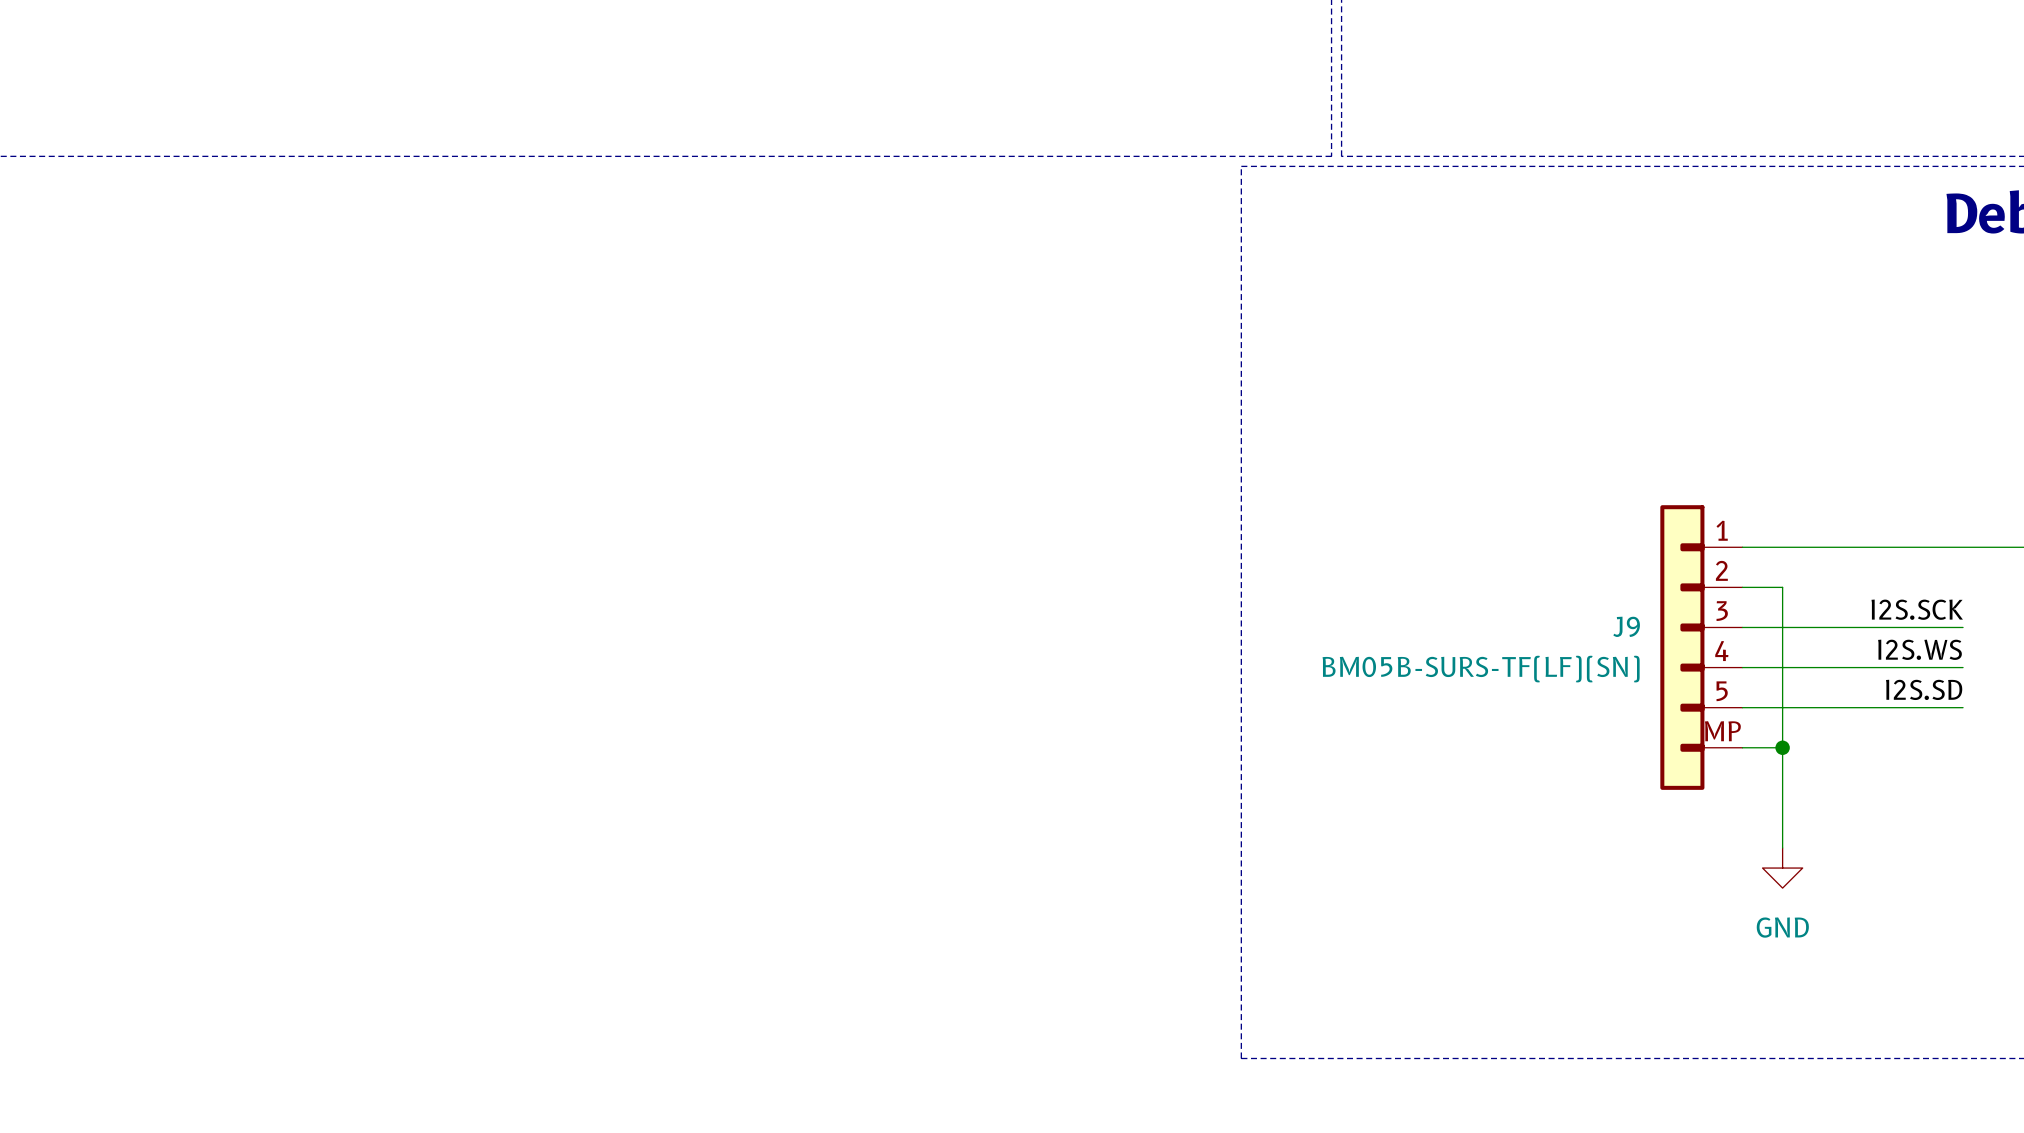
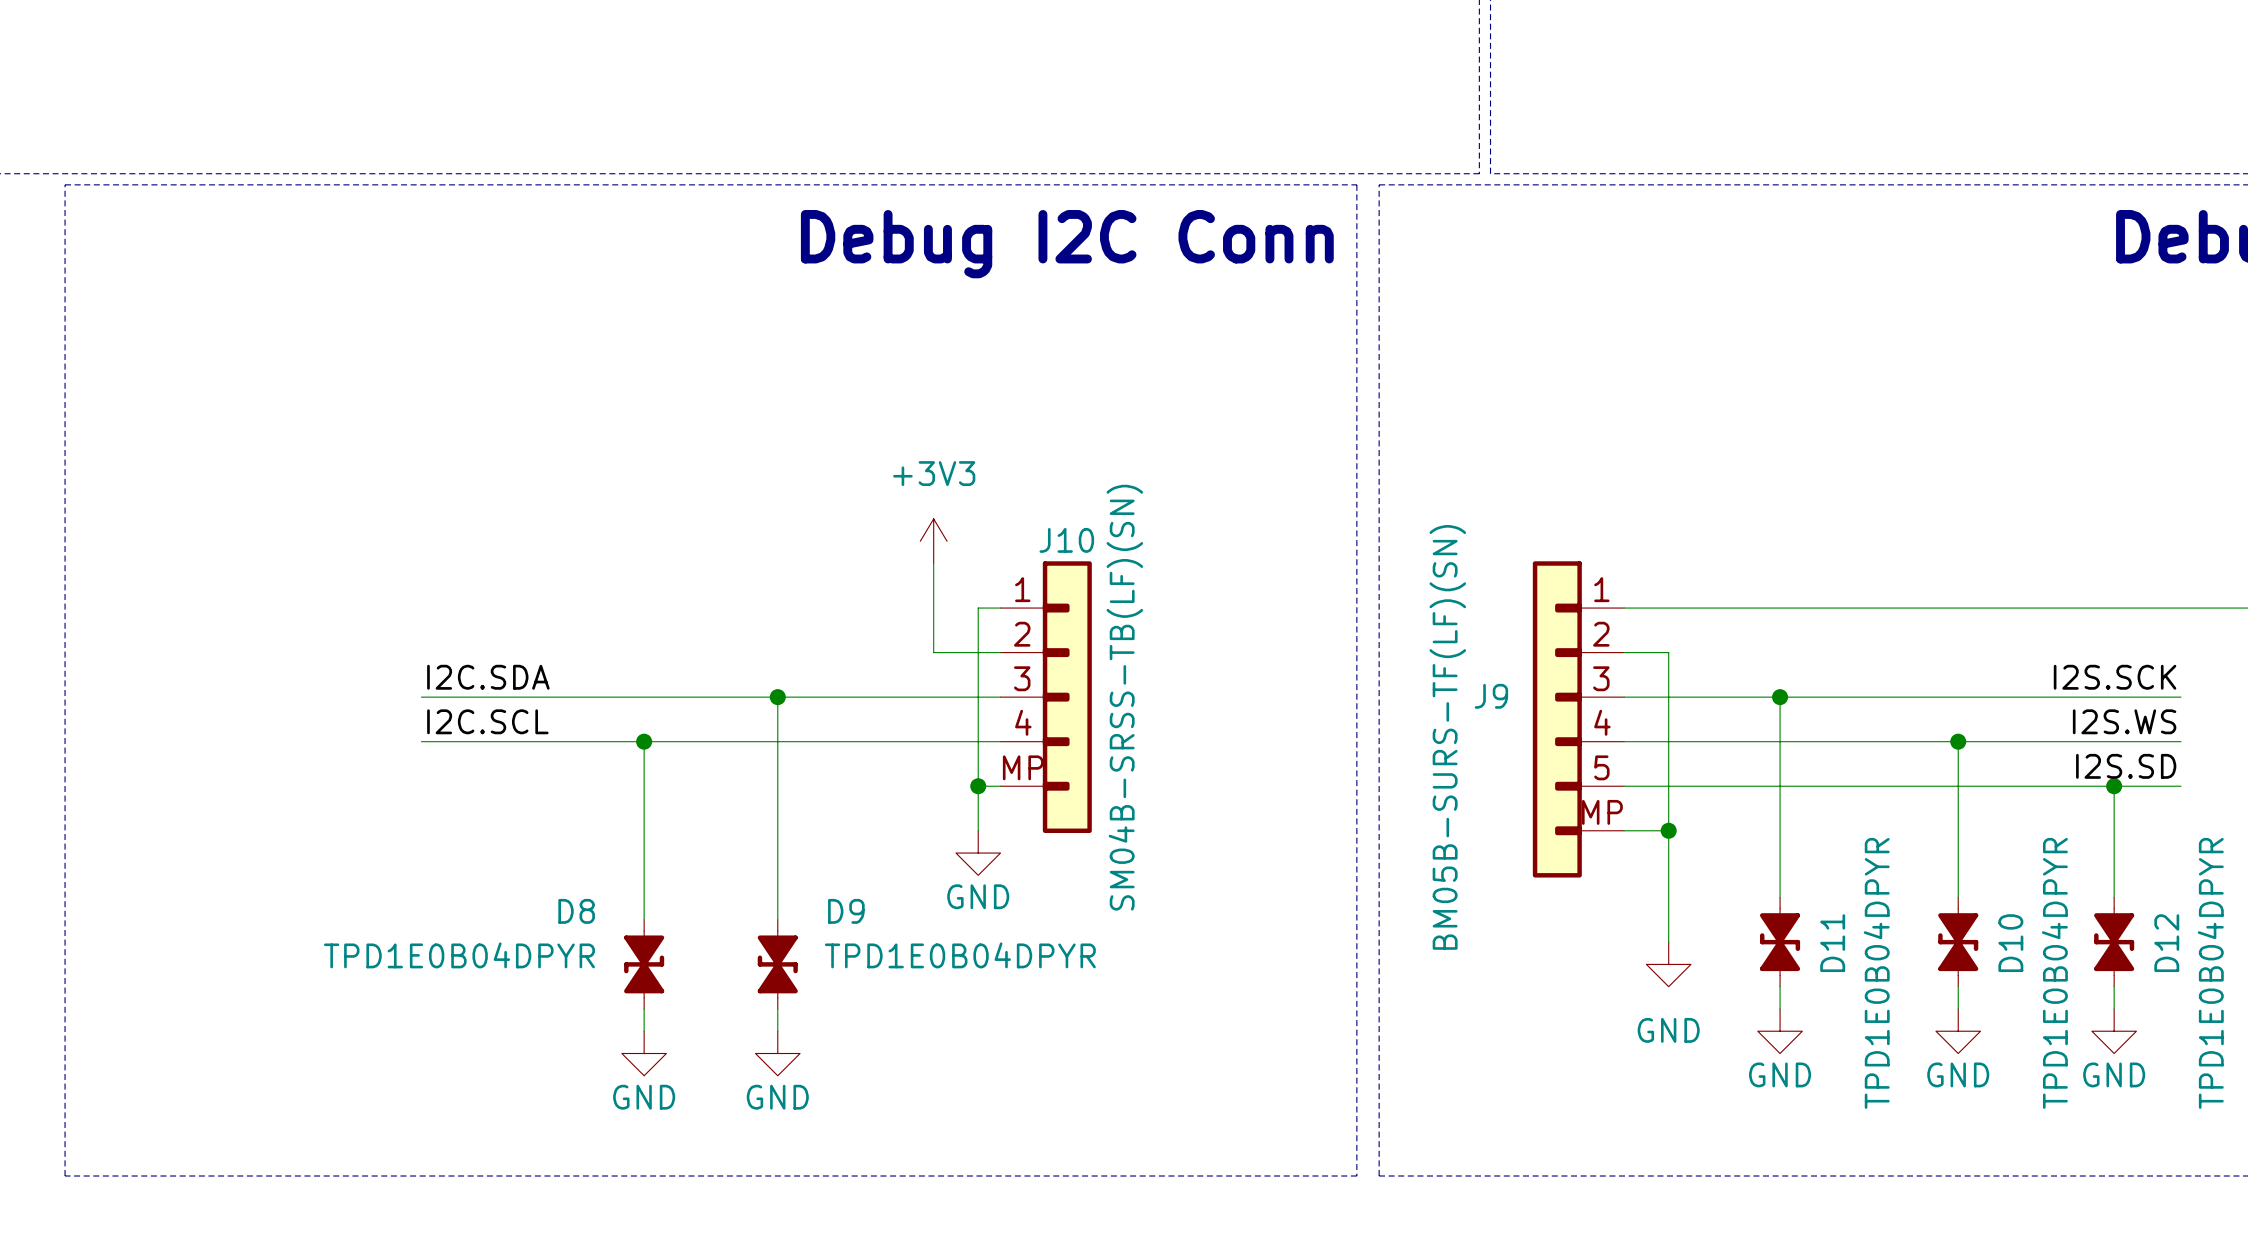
line: none -> (65, 184) (1356, 184) (1356, 1176) (65, 1176) (65, 184)
text: none -> Debug I2C Conn (1067, 244)
power symbol: none -> +3V3 (933, 541)
wire: none -> (933, 563) (933, 652) (1000, 652)
wire: none -> (1000, 608) (978, 608) (978, 830)
wire: none -> (1624, 608) (1935, 608)
wire: (1742, 587) (1782, 587) (1782, 848) -> (1624, 652) (1668, 652) (1668, 942)
label: none -> I2C.SDA (488, 677)
wire: none -> (421, 697) (1000, 697)
wire: none -> (777, 697) (777, 919)
junction: none -> (777, 697)
J10: none -> (1046, 697)
wire: none -> (1624, 697) (1935, 697)
wire: none -> (1780, 697) (1780, 897)
junction: none -> (1780, 697)
J9 position: (1701, 647) -> (1578, 719)
label: none -> I2C.SCL (487, 721)
wire: none -> (421, 741) (1000, 741)
wire: none -> (644, 741) (644, 919)
junction: none -> (644, 741)
wire: none -> (1624, 741) (1935, 741)
wire: none -> (1958, 741) (1958, 897)
junction: none -> (1958, 741)
J9 text rotation: 0° (1481, 669) -> 90° counterclockwise (1447, 737)
wire: none -> (978, 786) (1000, 786)
junction: none -> (978, 786)
wire: none -> (1624, 786) (1935, 786)
wire: none -> (2114, 786) (2114, 897)
junction: none -> (2114, 786)
junction: none -> (1668, 830)
wire: (1742, 747) (1782, 747) -> (1624, 830) (1668, 830)
junction: (1782, 747) -> none
power symbol: none -> GND (978, 853)
D11: none -> (1780, 942)
D10: none -> (1958, 942)
D12: none -> (2114, 942)
D8: none -> (644, 964)
D9: none -> (777, 964)
power symbol: none -> GND (1668, 964)
power symbol position: GND (1782, 868) -> GND (1958, 1031)
wire: none -> (1780, 986) (1780, 1008)
wire: none -> (1958, 986) (1958, 1008)
wire: none -> (2114, 986) (2114, 1008)
wire: none -> (644, 1008) (644, 1031)
wire: none -> (777, 1008) (777, 1031)
power symbol text position: GND (1782, 927) -> GND (1958, 1074)
power symbol: none -> GND (1780, 1031)
power symbol: none -> GND (2114, 1031)
power symbol: none -> GND (644, 1053)
power symbol: none -> GND (777, 1053)

